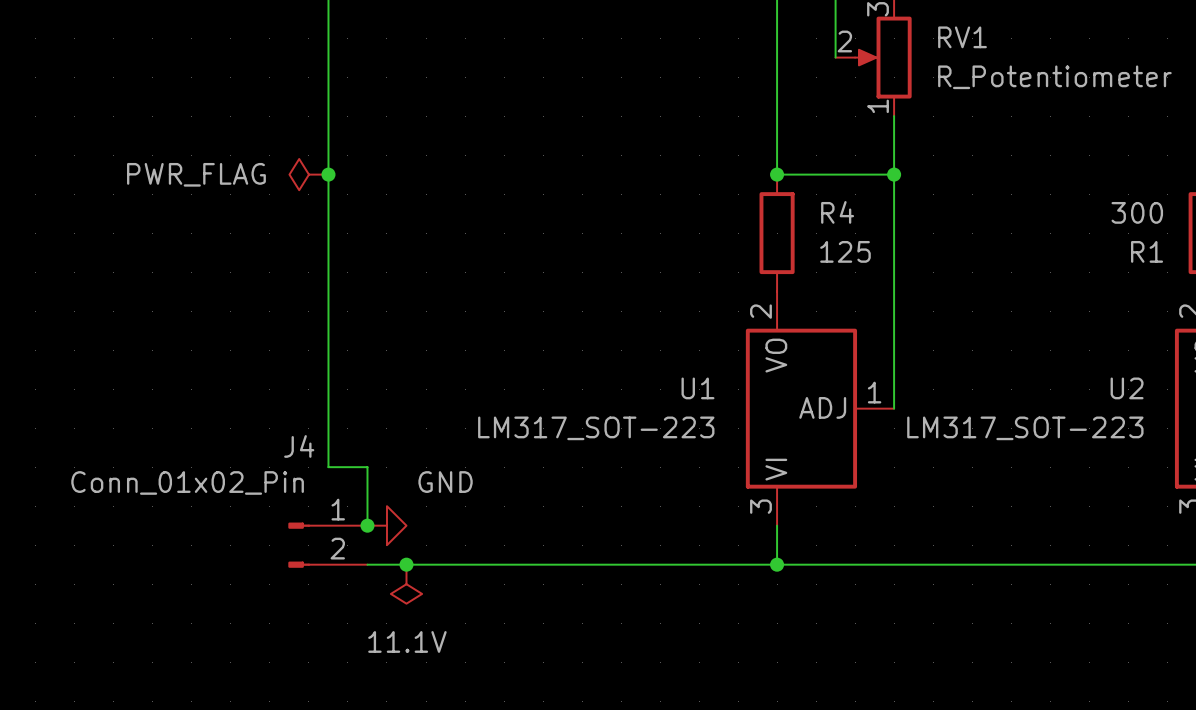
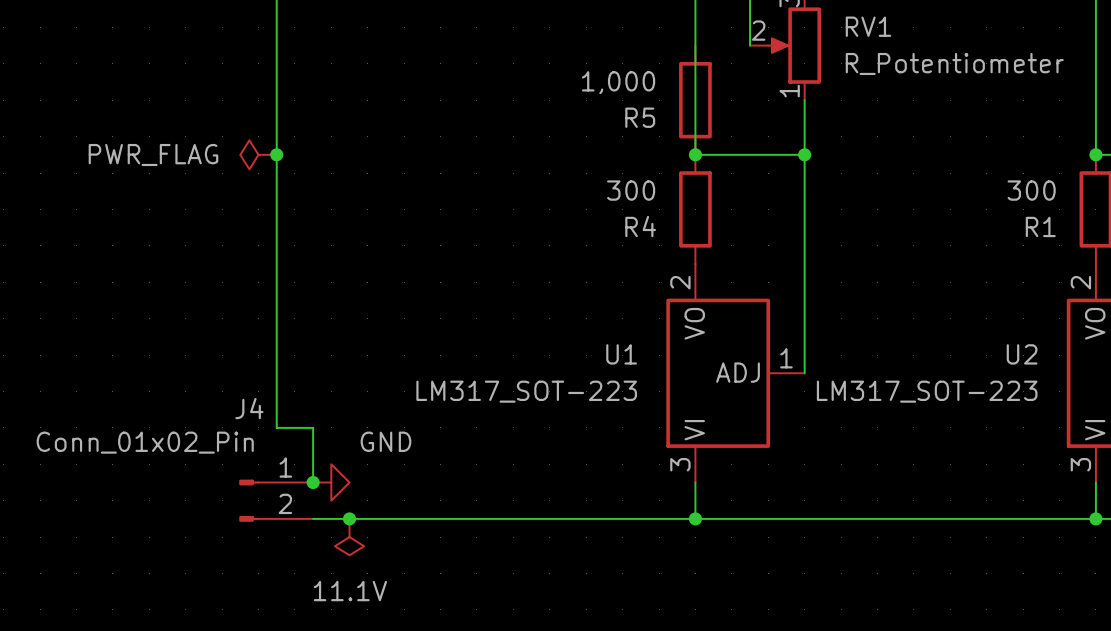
R5: none -> 1,000 (695, 100)
R4 name position: R4 (837, 212) -> R4 (640, 226)
R4 value: 125 (845, 251) -> 300 (631, 190)

